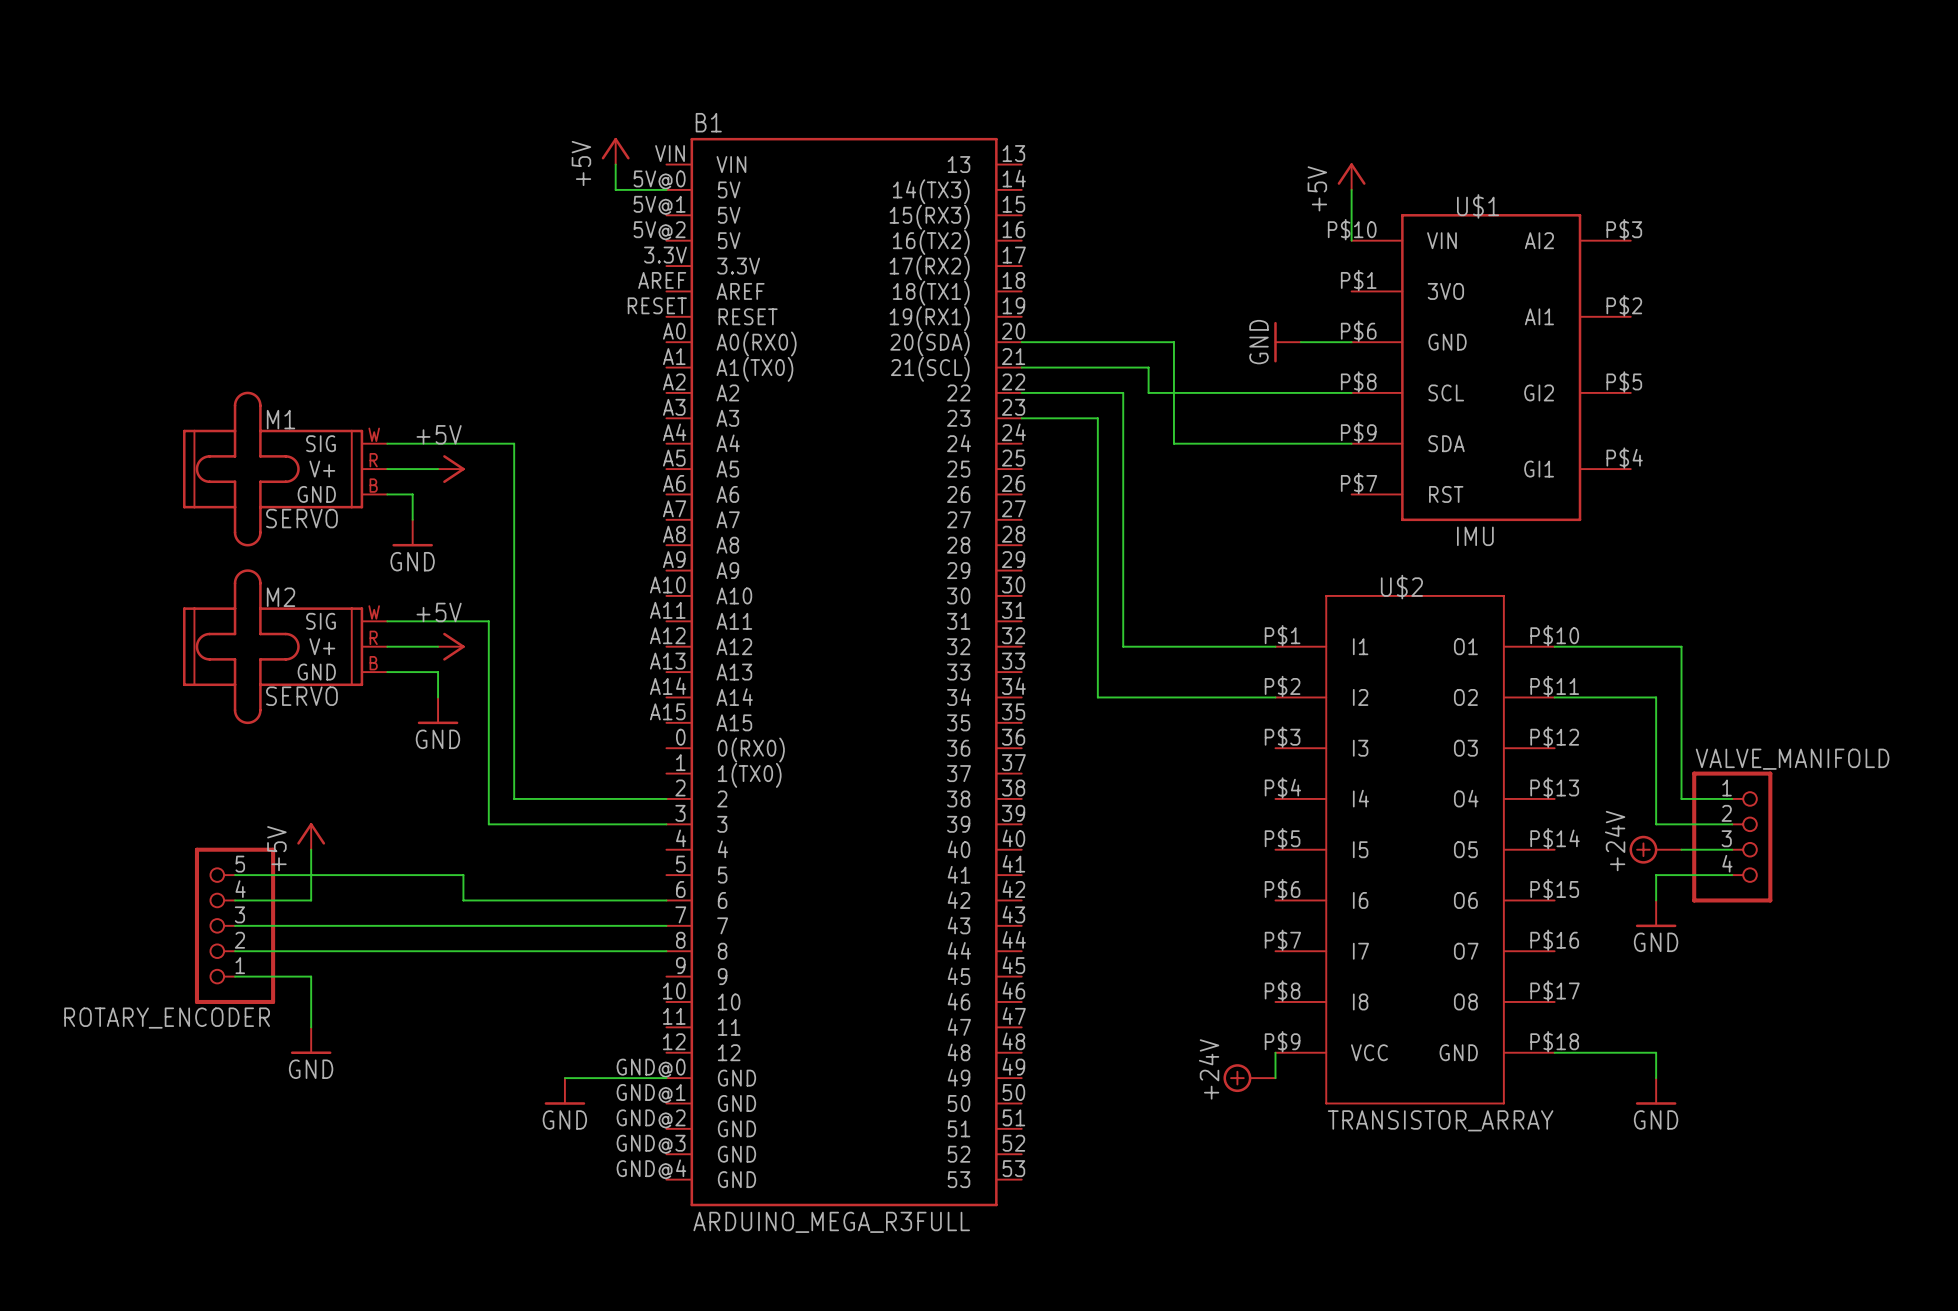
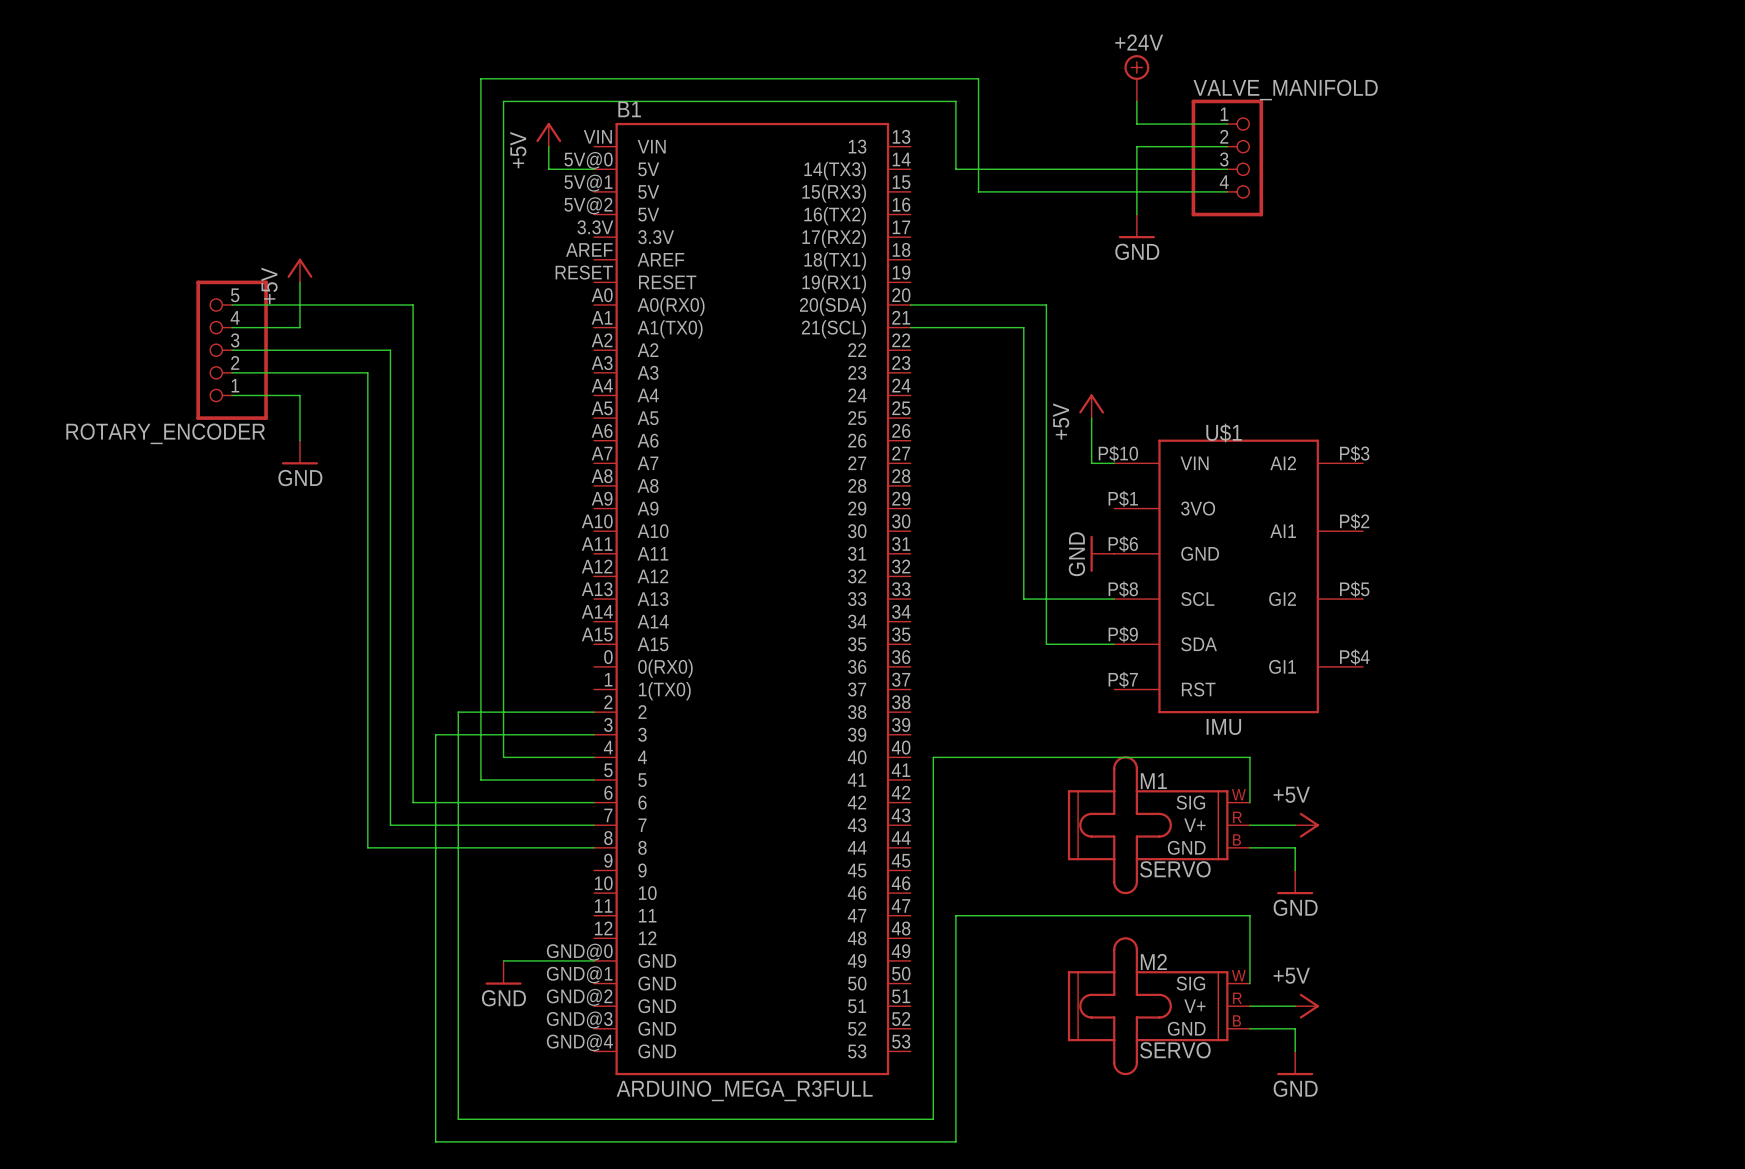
power symbol: none -> +24V (1136, 78)
wire: none -> (1136, 101) (1136, 124) (1227, 124)
wire: none -> (1227, 146) (1136, 146) (1136, 214)
power symbol: +5V (1351, 176) -> none
VALVE_MANIFOLD: none -> (1227, 157)
wire: (1351, 189) (1351, 240) -> none
wire: none -> (1227, 169) (955, 169) (955, 101) (503, 101) (503, 757) (594, 757)
wire: none -> (1227, 191) (978, 191) (978, 78) (480, 78) (480, 780) (594, 780)
power symbol: none -> +5V (299, 270)
wire: none -> (299, 282) (299, 327) (232, 327)
power symbol rotation: 0° (1275, 342) -> 90° counterclockwise (1136, 237)
power symbol position: GND (1287, 342) -> GND (1136, 226)
wire: (1300, 342) (1351, 342) -> none
U$1 position: (1491, 367) -> (1238, 576)
ROTARY_ENCODER: none -> (232, 350)
wire: (1021, 392) (1123, 392) (1123, 646) (1275, 646) -> none
wire: (1148, 392) (1351, 392) -> (1023, 350) (1023, 599) (1114, 599)
wire: (1021, 418) (1097, 418) (1097, 697) (1275, 697) -> none
wire: none -> (232, 395) (299, 395) (299, 440)
wire: (387, 443) (514, 443) (514, 798) -> (1249, 802) (1249, 757) (933, 757) (933, 1119) (458, 1119) (458, 712)
wire: (1173, 443) (1351, 443) -> (1046, 395) (1046, 644) (1114, 644)
power symbol: none -> +5V (1091, 406)
M1 position: (285, 469) -> (1158, 825)
wire: (387, 469) (438, 469) -> none
power symbol: +5V (451, 469) -> none
wire: none -> (1091, 418) (1091, 463) (1114, 463)
wire: (387, 494) (412, 494) -> (232, 372) (367, 372) (367, 440)
power symbol position: GND (412, 533) -> GND (299, 452)
wire: (387, 621) (488, 621) (488, 824) -> (1249, 983) (1249, 915) (955, 915) (955, 1141) (435, 1141) (435, 734)
power symbol: none -> GND (1102, 553)
M2 position: (285, 646) -> (1158, 1006)
wire: (387, 646) (438, 646) -> none
power symbol: +5V (451, 646) -> none
wire: (1554, 646) (1681, 646) (1681, 798) (1732, 798) -> none
wire: (387, 672) (438, 672) -> (232, 350) (390, 350) (390, 599)
wire: (1554, 697) (1656, 697) (1656, 824) (1732, 824) -> none
power symbol: GND (438, 710) -> none
power symbol: +5V (311, 836) -> none
VALVE_MANIFOLD: (1732, 837) -> none
wire: (311, 849) (311, 900) (235, 900) -> none
U$2: TRANSISTOR_ARRAY (1415, 849) -> none
power symbol: +24V (1655, 849) -> none
wire: (1681, 849) (1732, 849) -> none
wire: (235, 875) (463, 875) -> (232, 305) (413, 305) (413, 780)
wire: (1732, 875) (1656, 875) (1656, 900) -> none
power symbol: GND (1656, 913) -> none
wire: (235, 925) (438, 925) -> (390, 621) (390, 825)
ROTARY_ENCODER: (235, 925) -> none
wire: none -> (1249, 825) (1295, 825)
power symbol: none -> +5V (1307, 825)
wire: (235, 951) (412, 951) -> (367, 463) (367, 847)
wire: none -> (1249, 847) (1295, 847) (1295, 870)
wire: (235, 976) (311, 976) (311, 1027) -> none
power symbol: none -> GND (1295, 882)
power symbol: GND (311, 1040) -> none
wire: (1554, 1052) (1656, 1052) (1656, 1078) -> none
power symbol: +24V (1249, 1078) -> none
power symbol: GND (1656, 1091) -> none
wire: none -> (1249, 1006) (1295, 1006)
power symbol: none -> +5V (1307, 1006)
wire: none -> (1249, 1028) (1295, 1028) (1295, 1051)
power symbol: none -> GND (1295, 1063)

